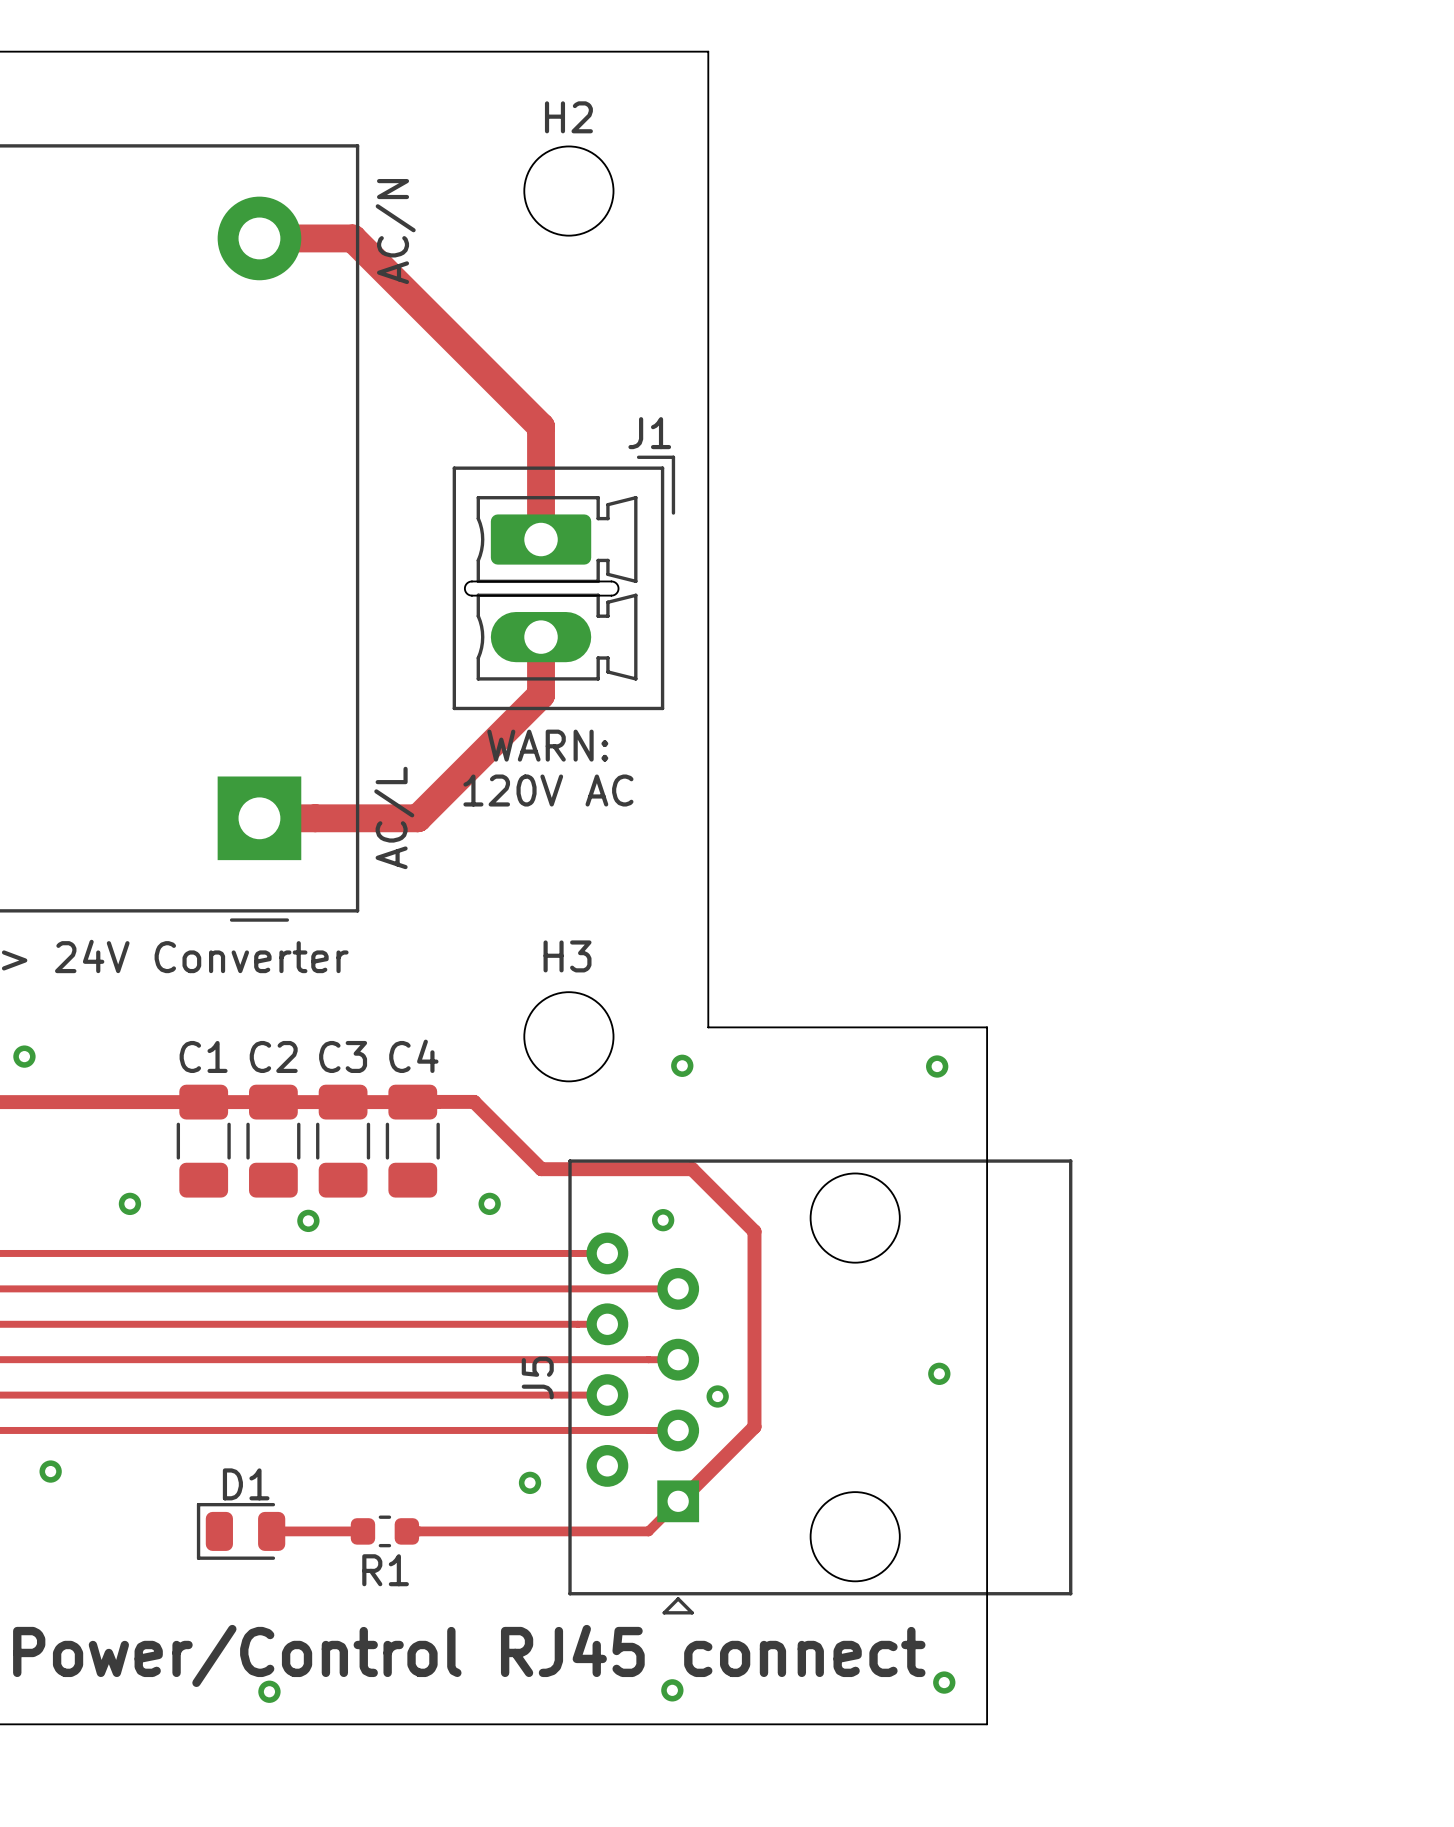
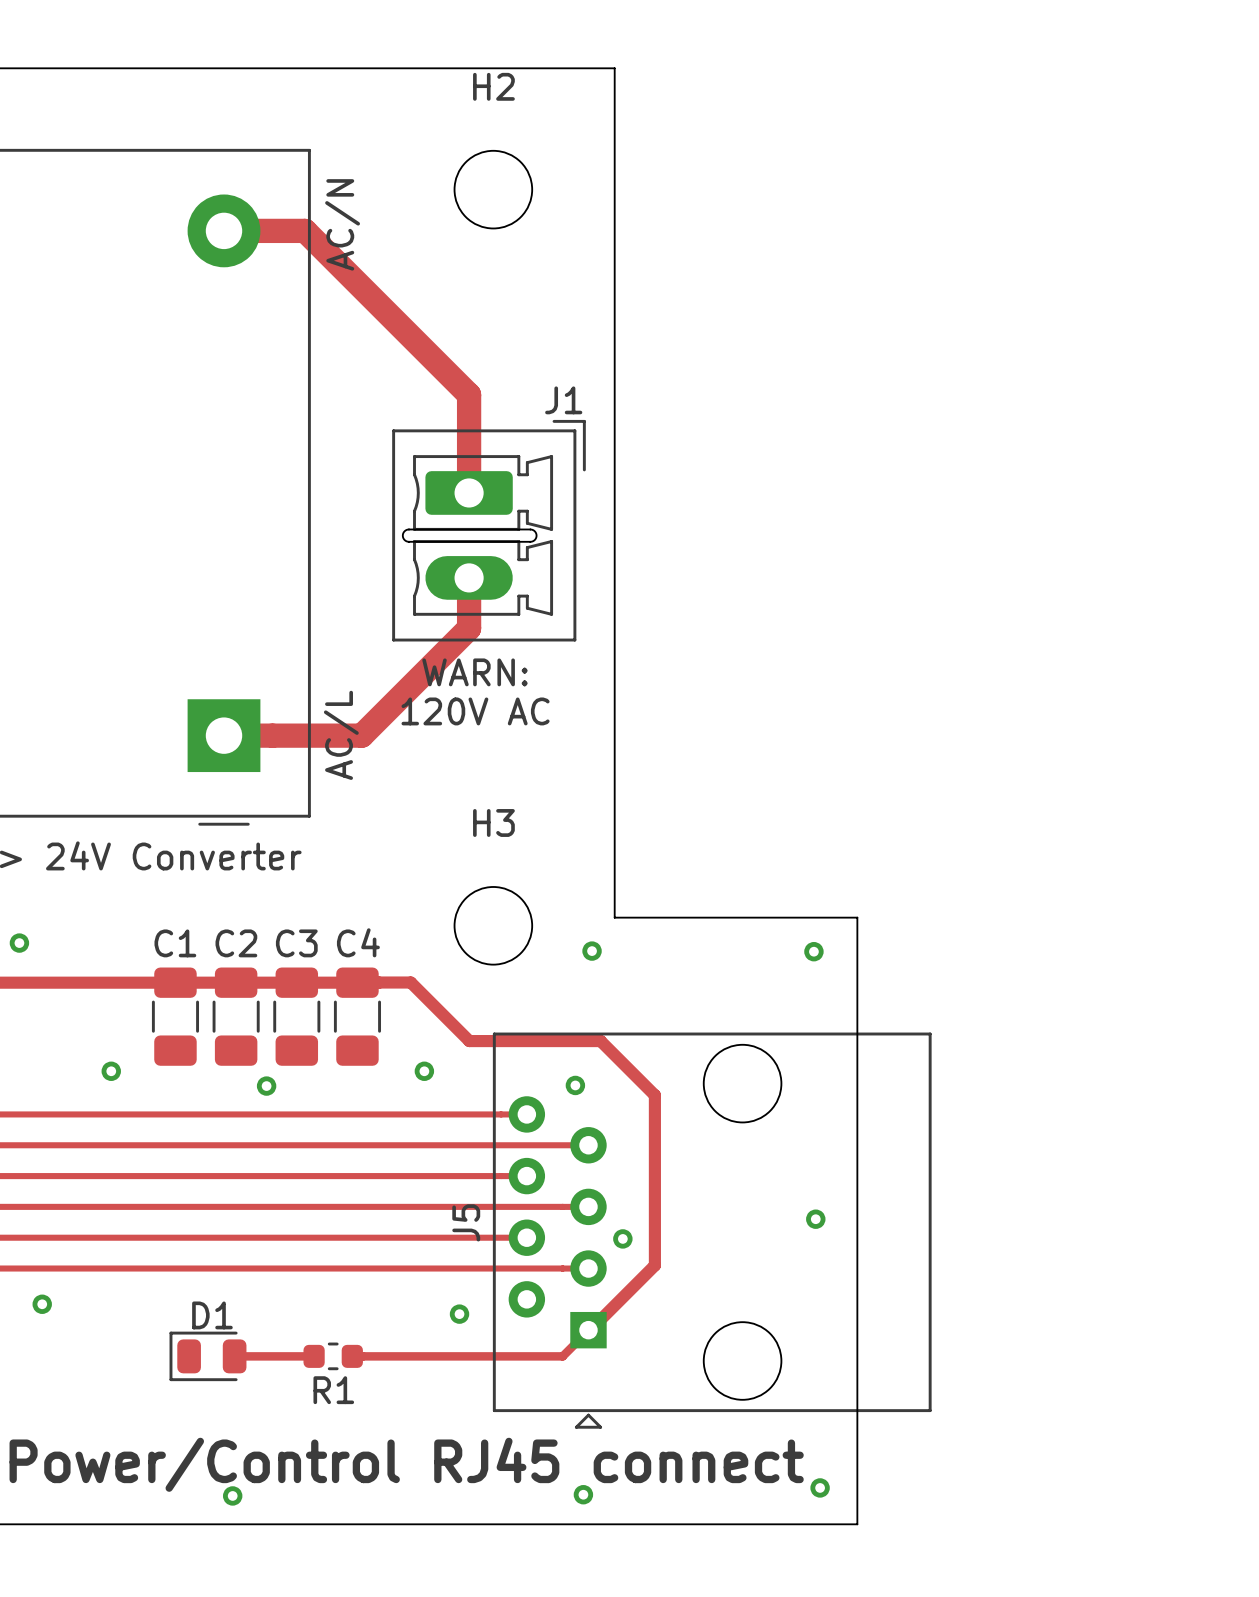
H2 name position: H2 (568, 117) -> H2 (493, 86)
H3 name position: H3 (567, 956) -> H3 (493, 822)

